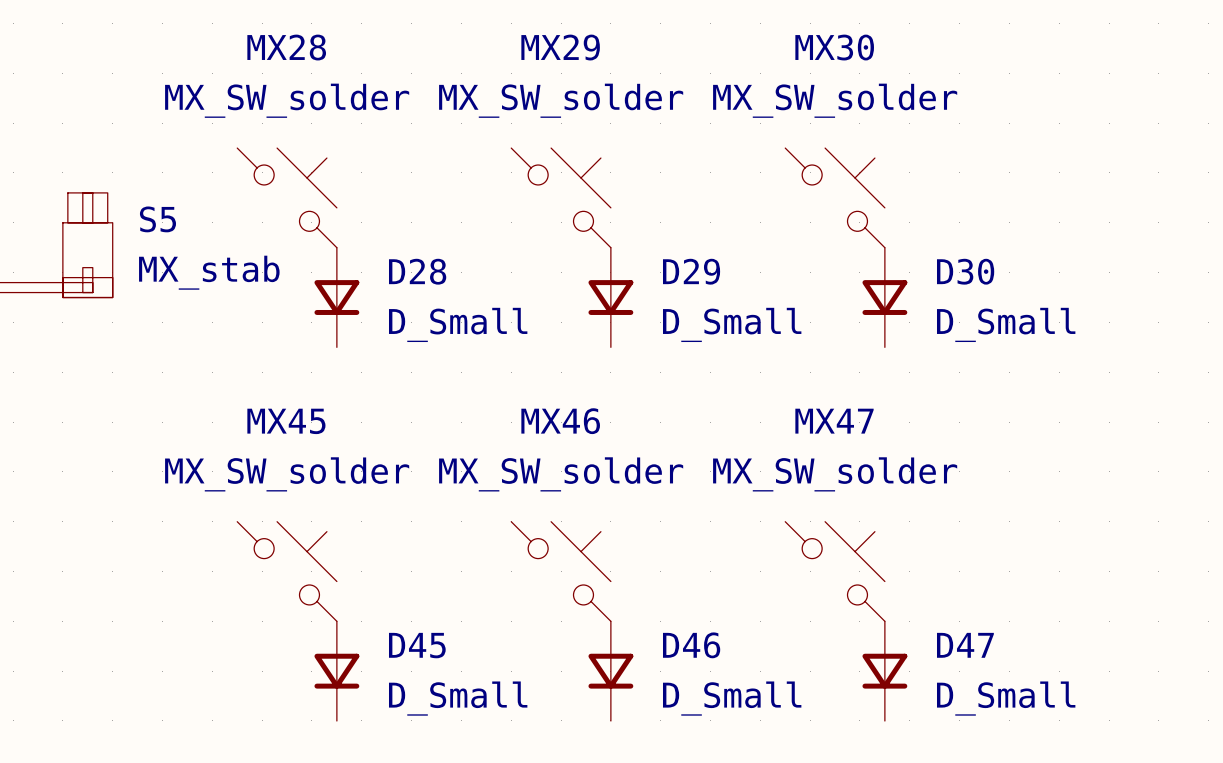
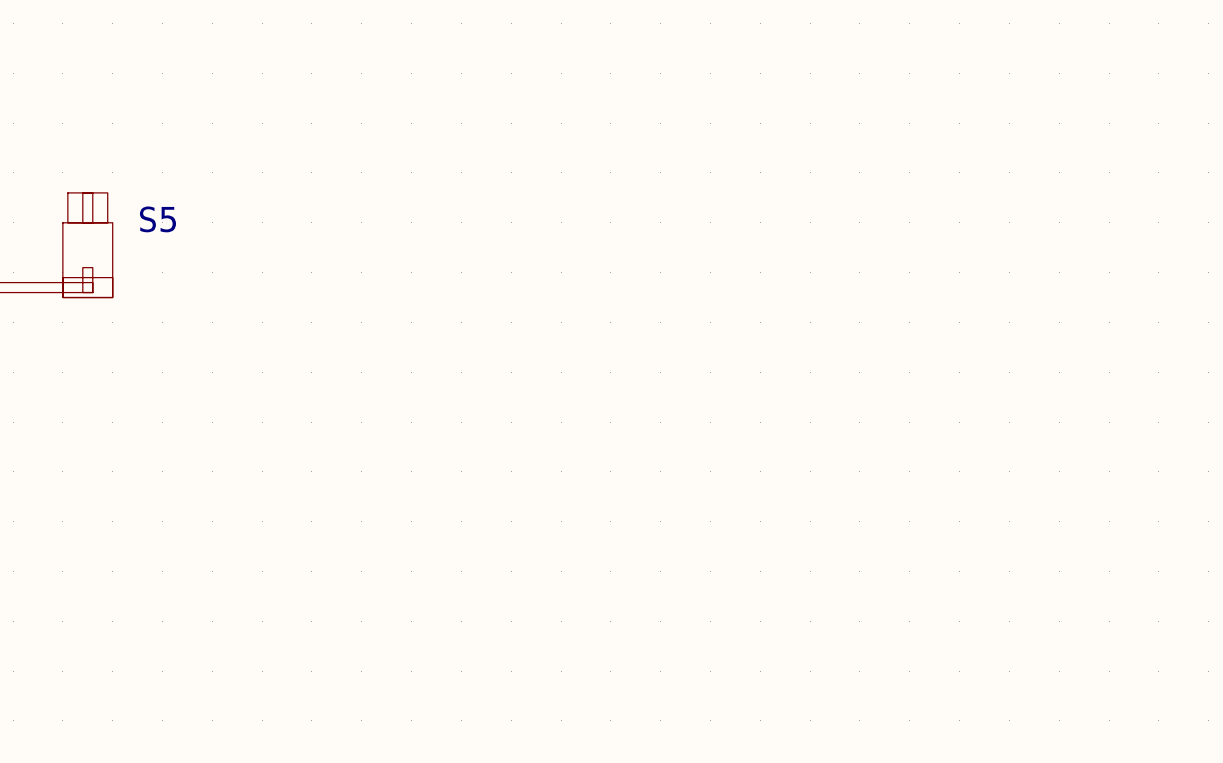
MX28: MX_SW_solder (287, 197) -> none
MX29: MX_SW_solder (561, 197) -> none
MX30: MX_SW_solder (835, 197) -> none
S5 value: MX_stab (209, 272) -> none
D28: D_Small (336, 297) -> none
D29: D_Small (610, 297) -> none
D30: D_Small (884, 297) -> none
MX45: MX_SW_solder (287, 571) -> none
MX46: MX_SW_solder (561, 571) -> none
MX47: MX_SW_solder (835, 571) -> none
D45: D_Small (336, 671) -> none
D46: D_Small (610, 671) -> none
D47: D_Small (884, 671) -> none

